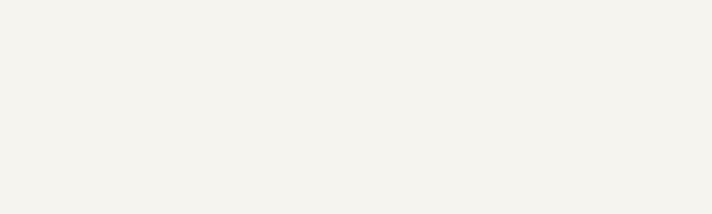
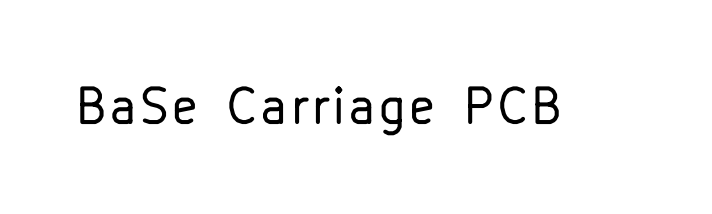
text: none -> BaSe Carriage PCB (319, 110)

